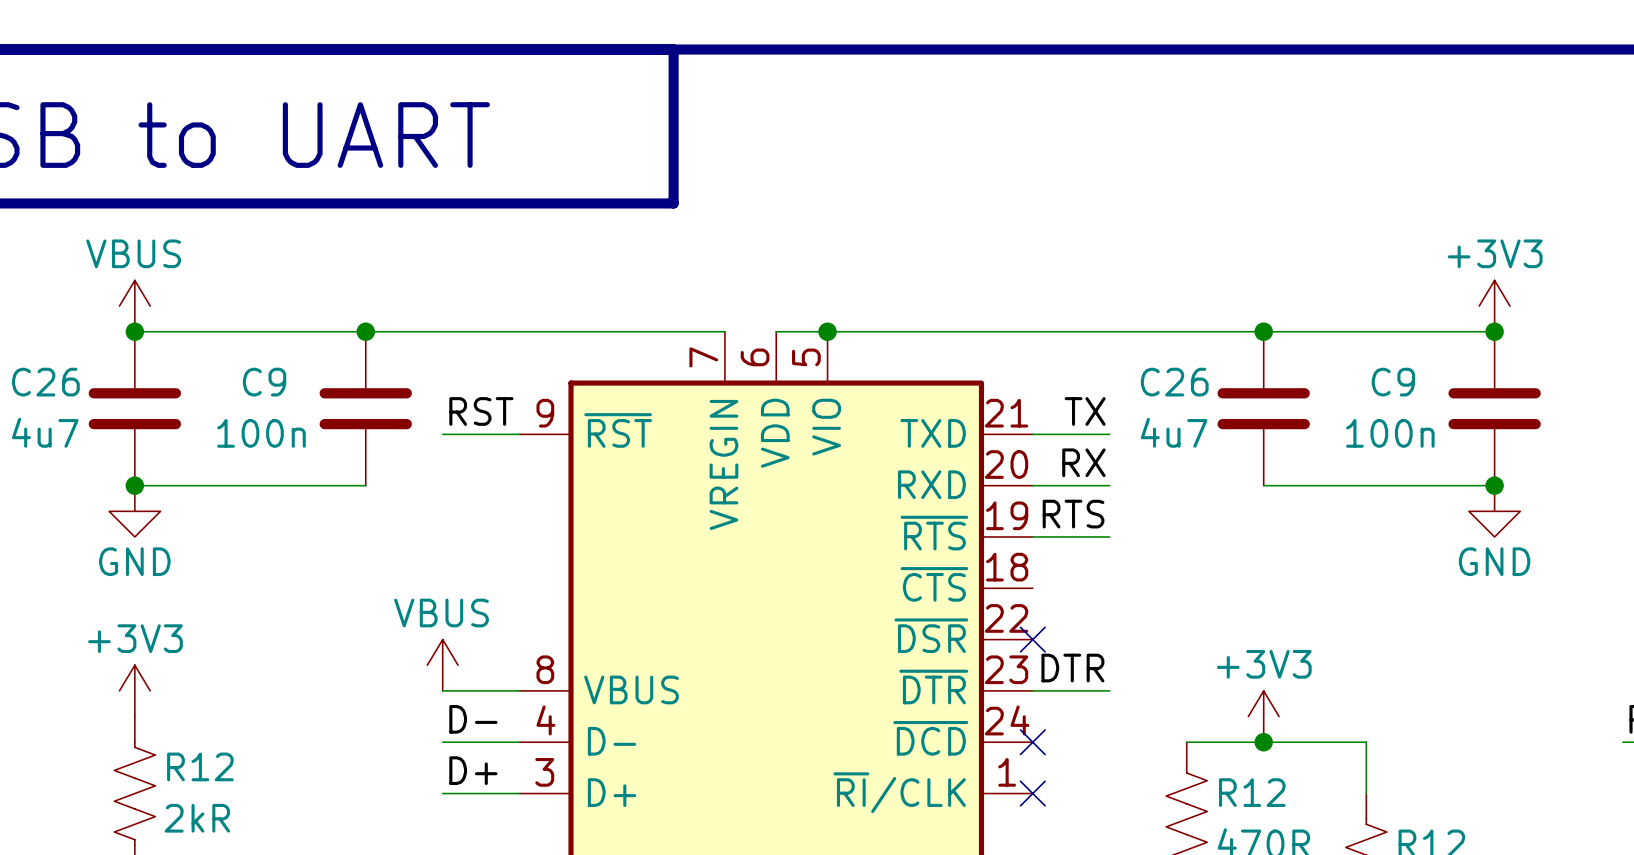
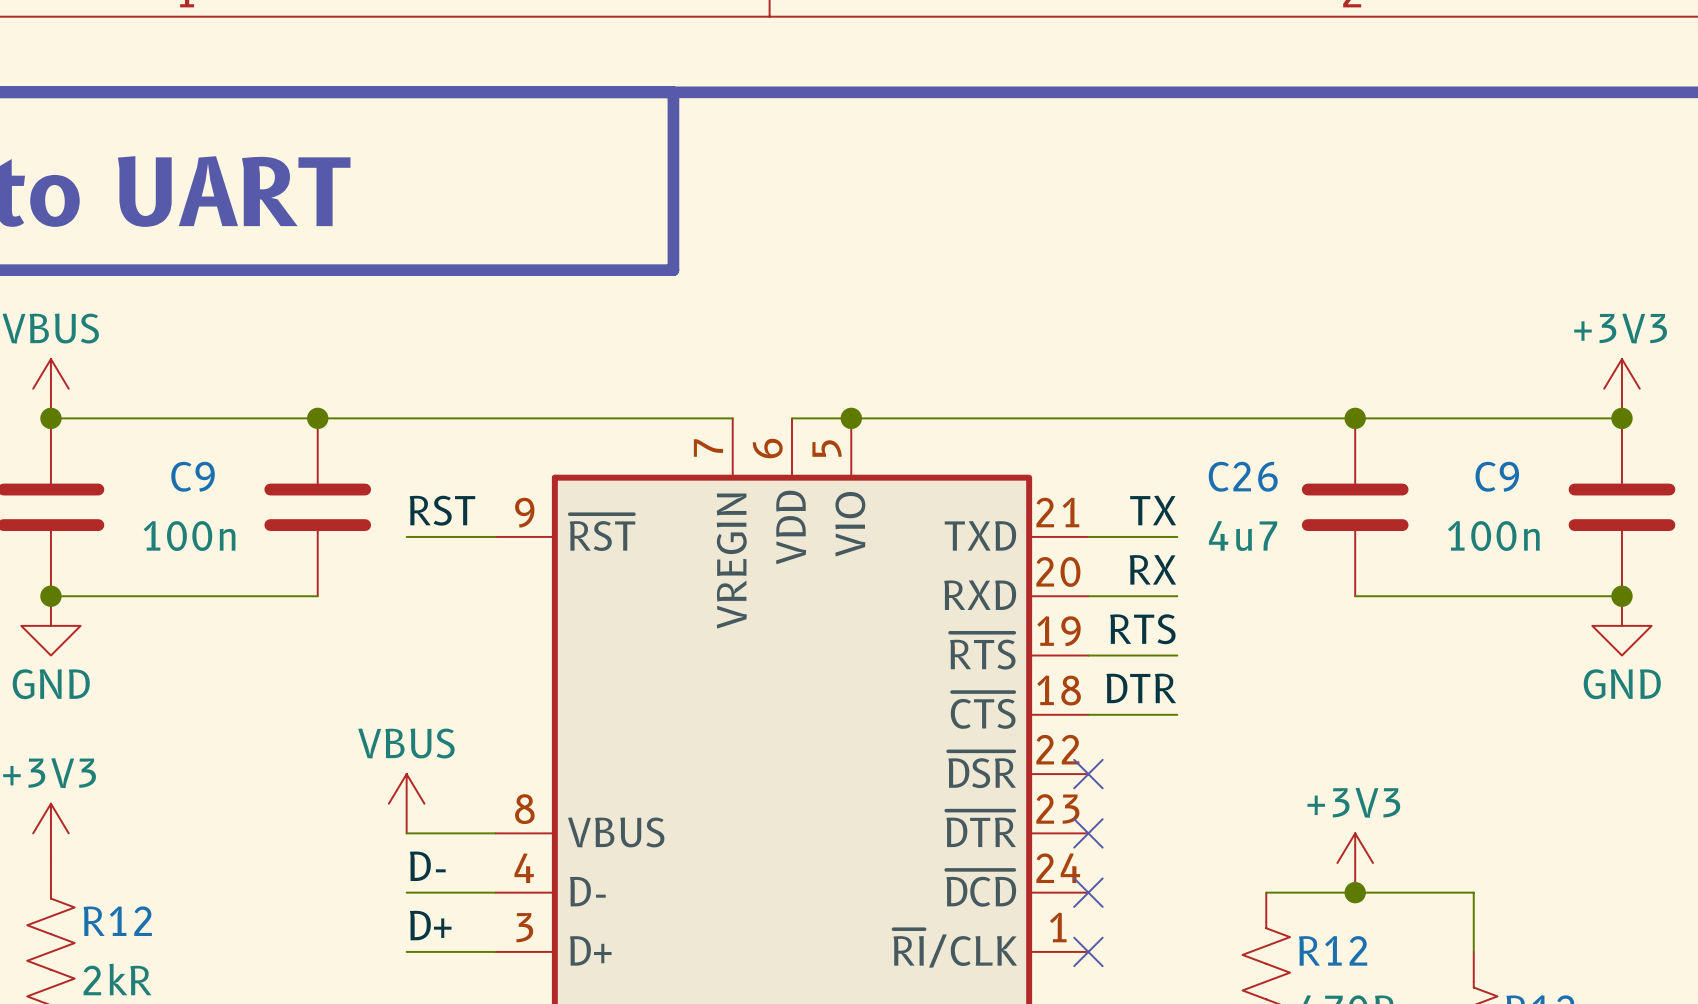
label position: DTR (1072, 668) -> DTR (1141, 688)
wire: (1032, 690) (1109, 690) -> (1088, 714) (1177, 714)
no-connect mark: none -> (1088, 833)

